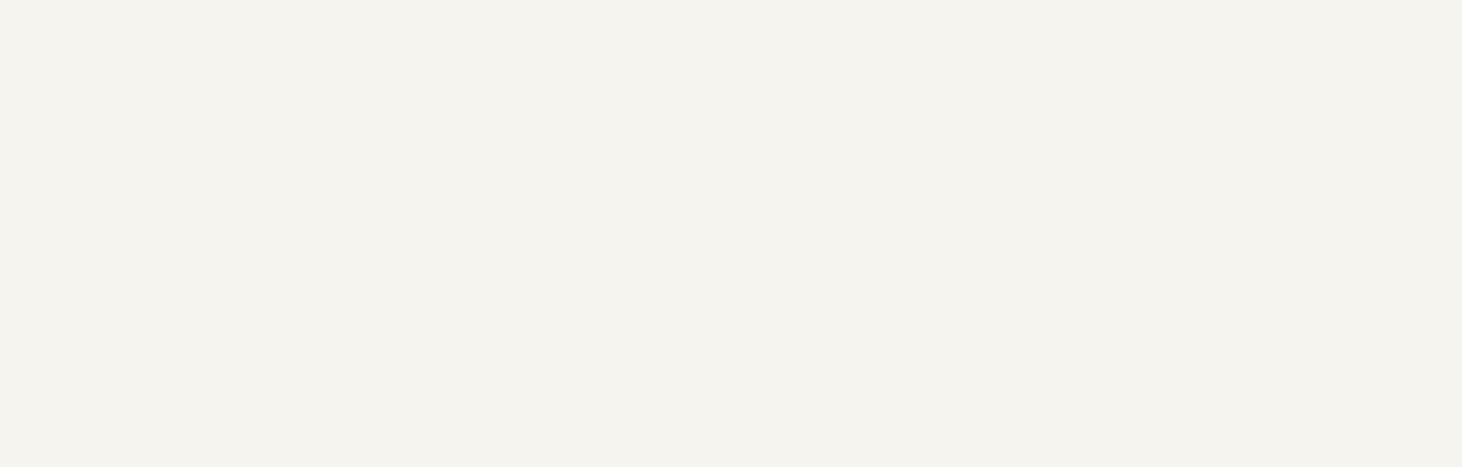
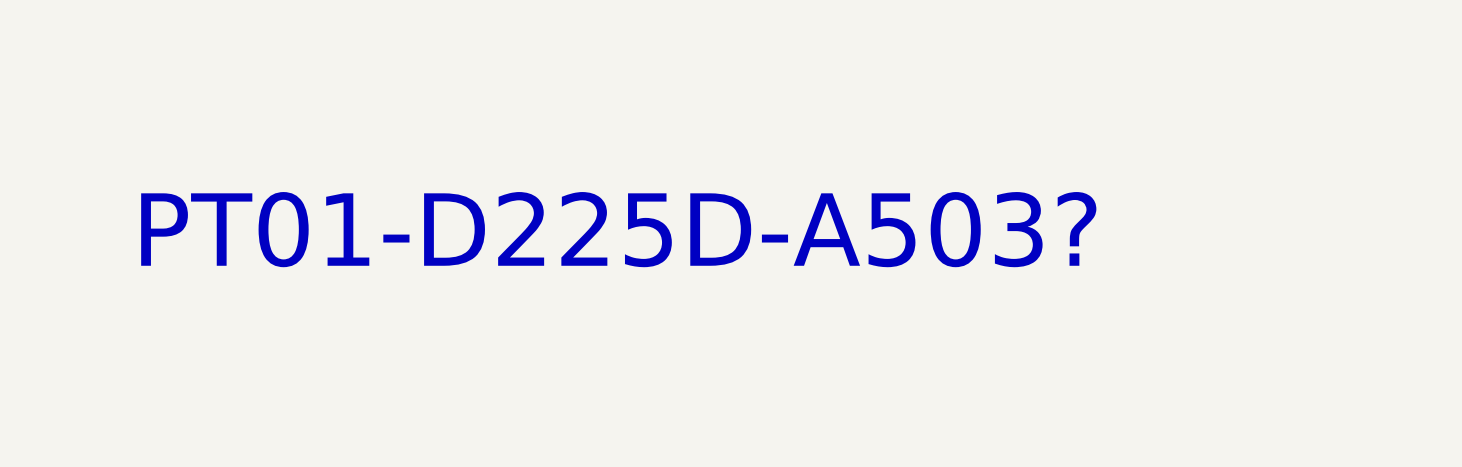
text: none -> PT01-D225D-A503? (618, 229)

